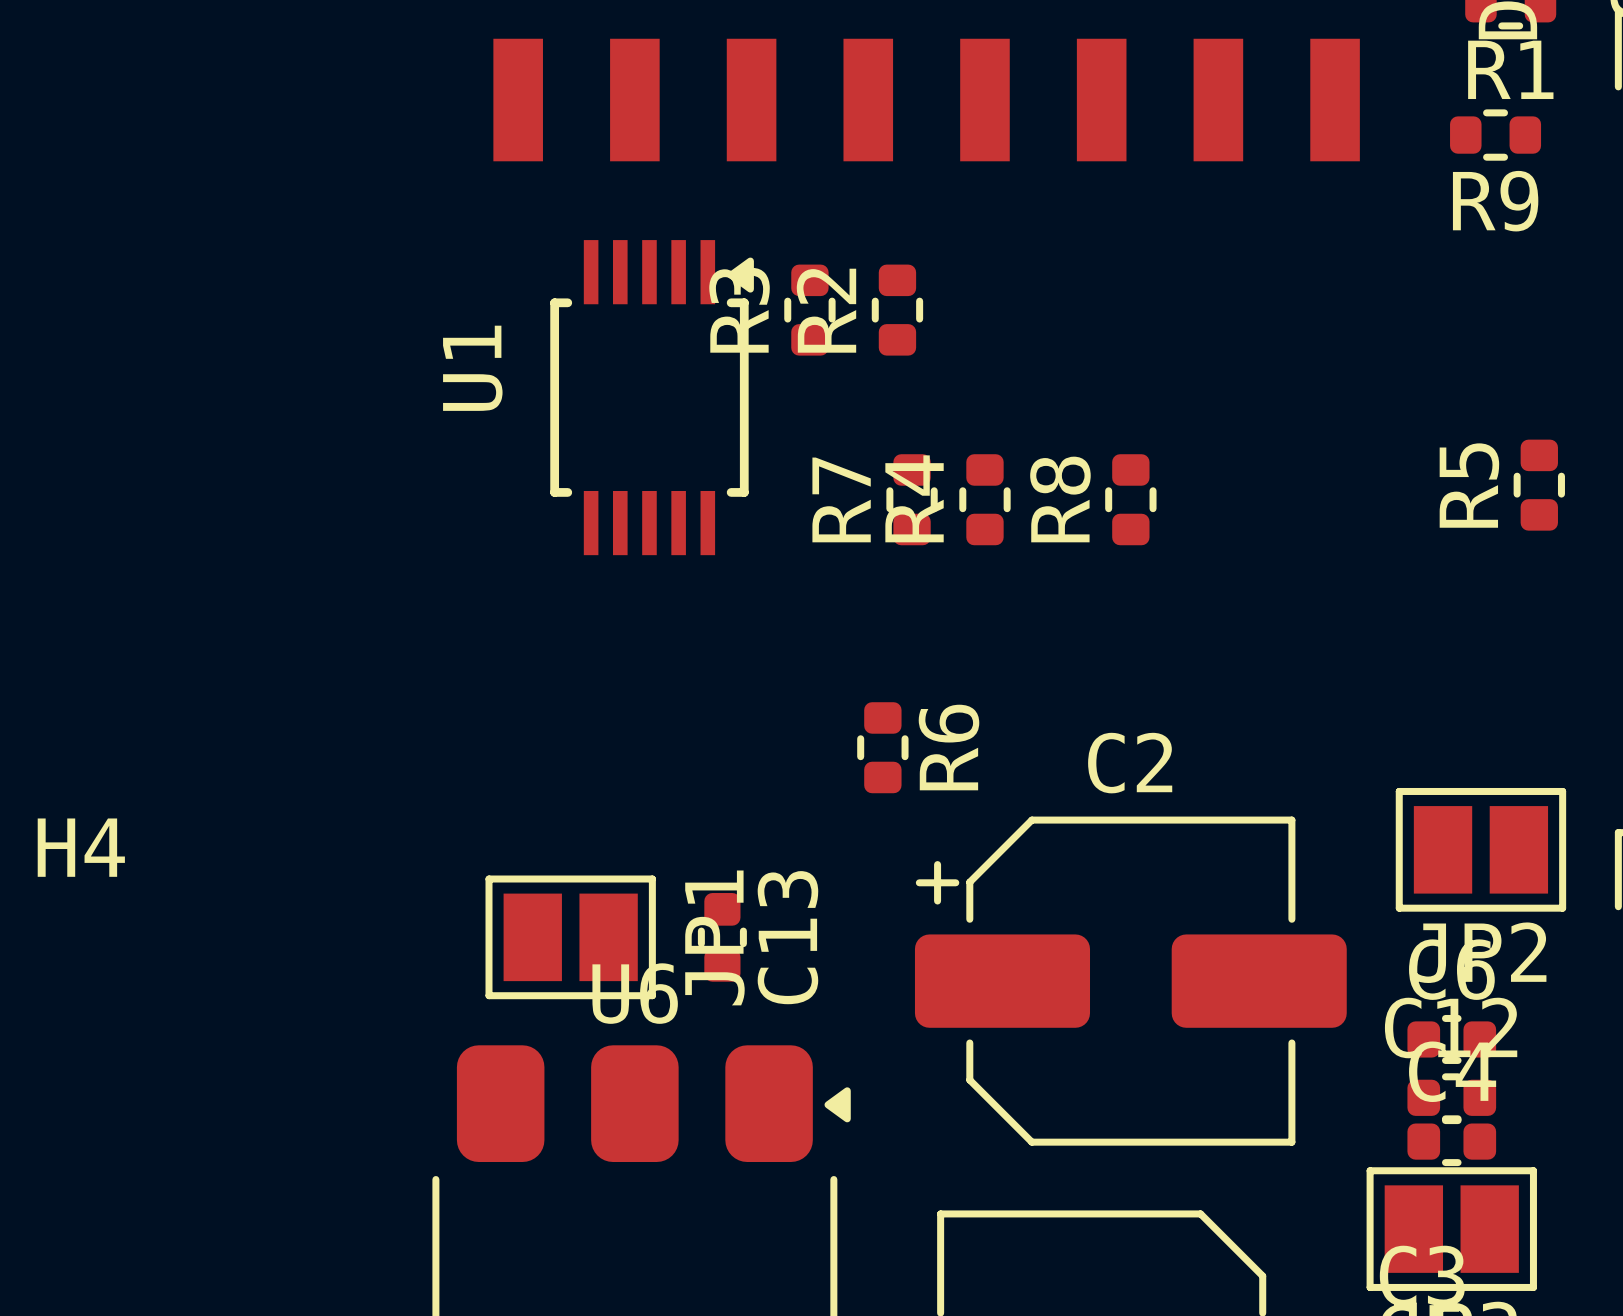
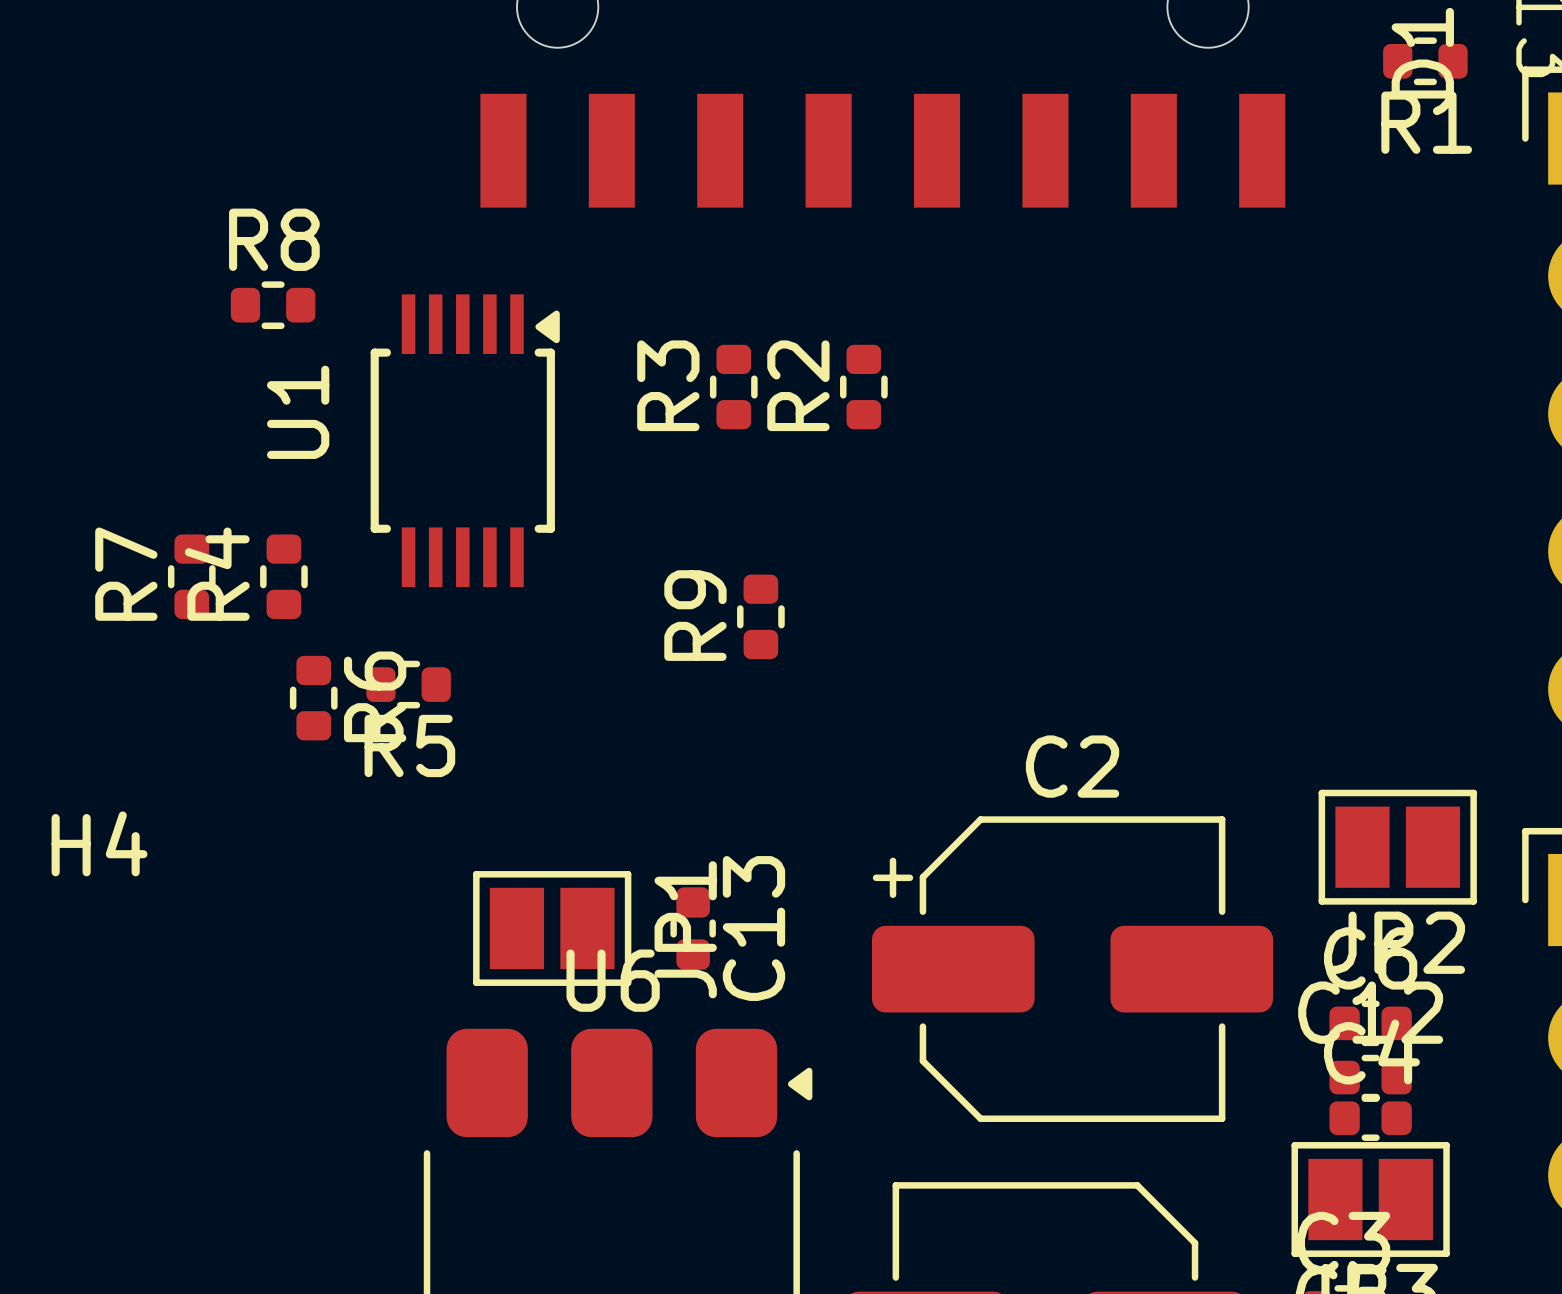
R9 rotation: 0° (1495, 135) -> 90° clockwise (760, 616)
R9 position: (1495, 135) -> (760, 616)
R3 position: (809, 310) -> (733, 387)
R2 position: (897, 310) -> (863, 387)
U1 position: (652, 397) -> (465, 440)
R5 rotation: 0° (1539, 485) -> 90° clockwise (408, 684)
R5 position: (1539, 485) -> (408, 684)
R7 position: (912, 499) -> (191, 576)
R4 position: (984, 499) -> (283, 576)
R8 rotation: 0° (1130, 499) -> 90° clockwise (273, 305)
R8 position: (1130, 499) -> (273, 305)
R6 position: (882, 747) -> (313, 698)

